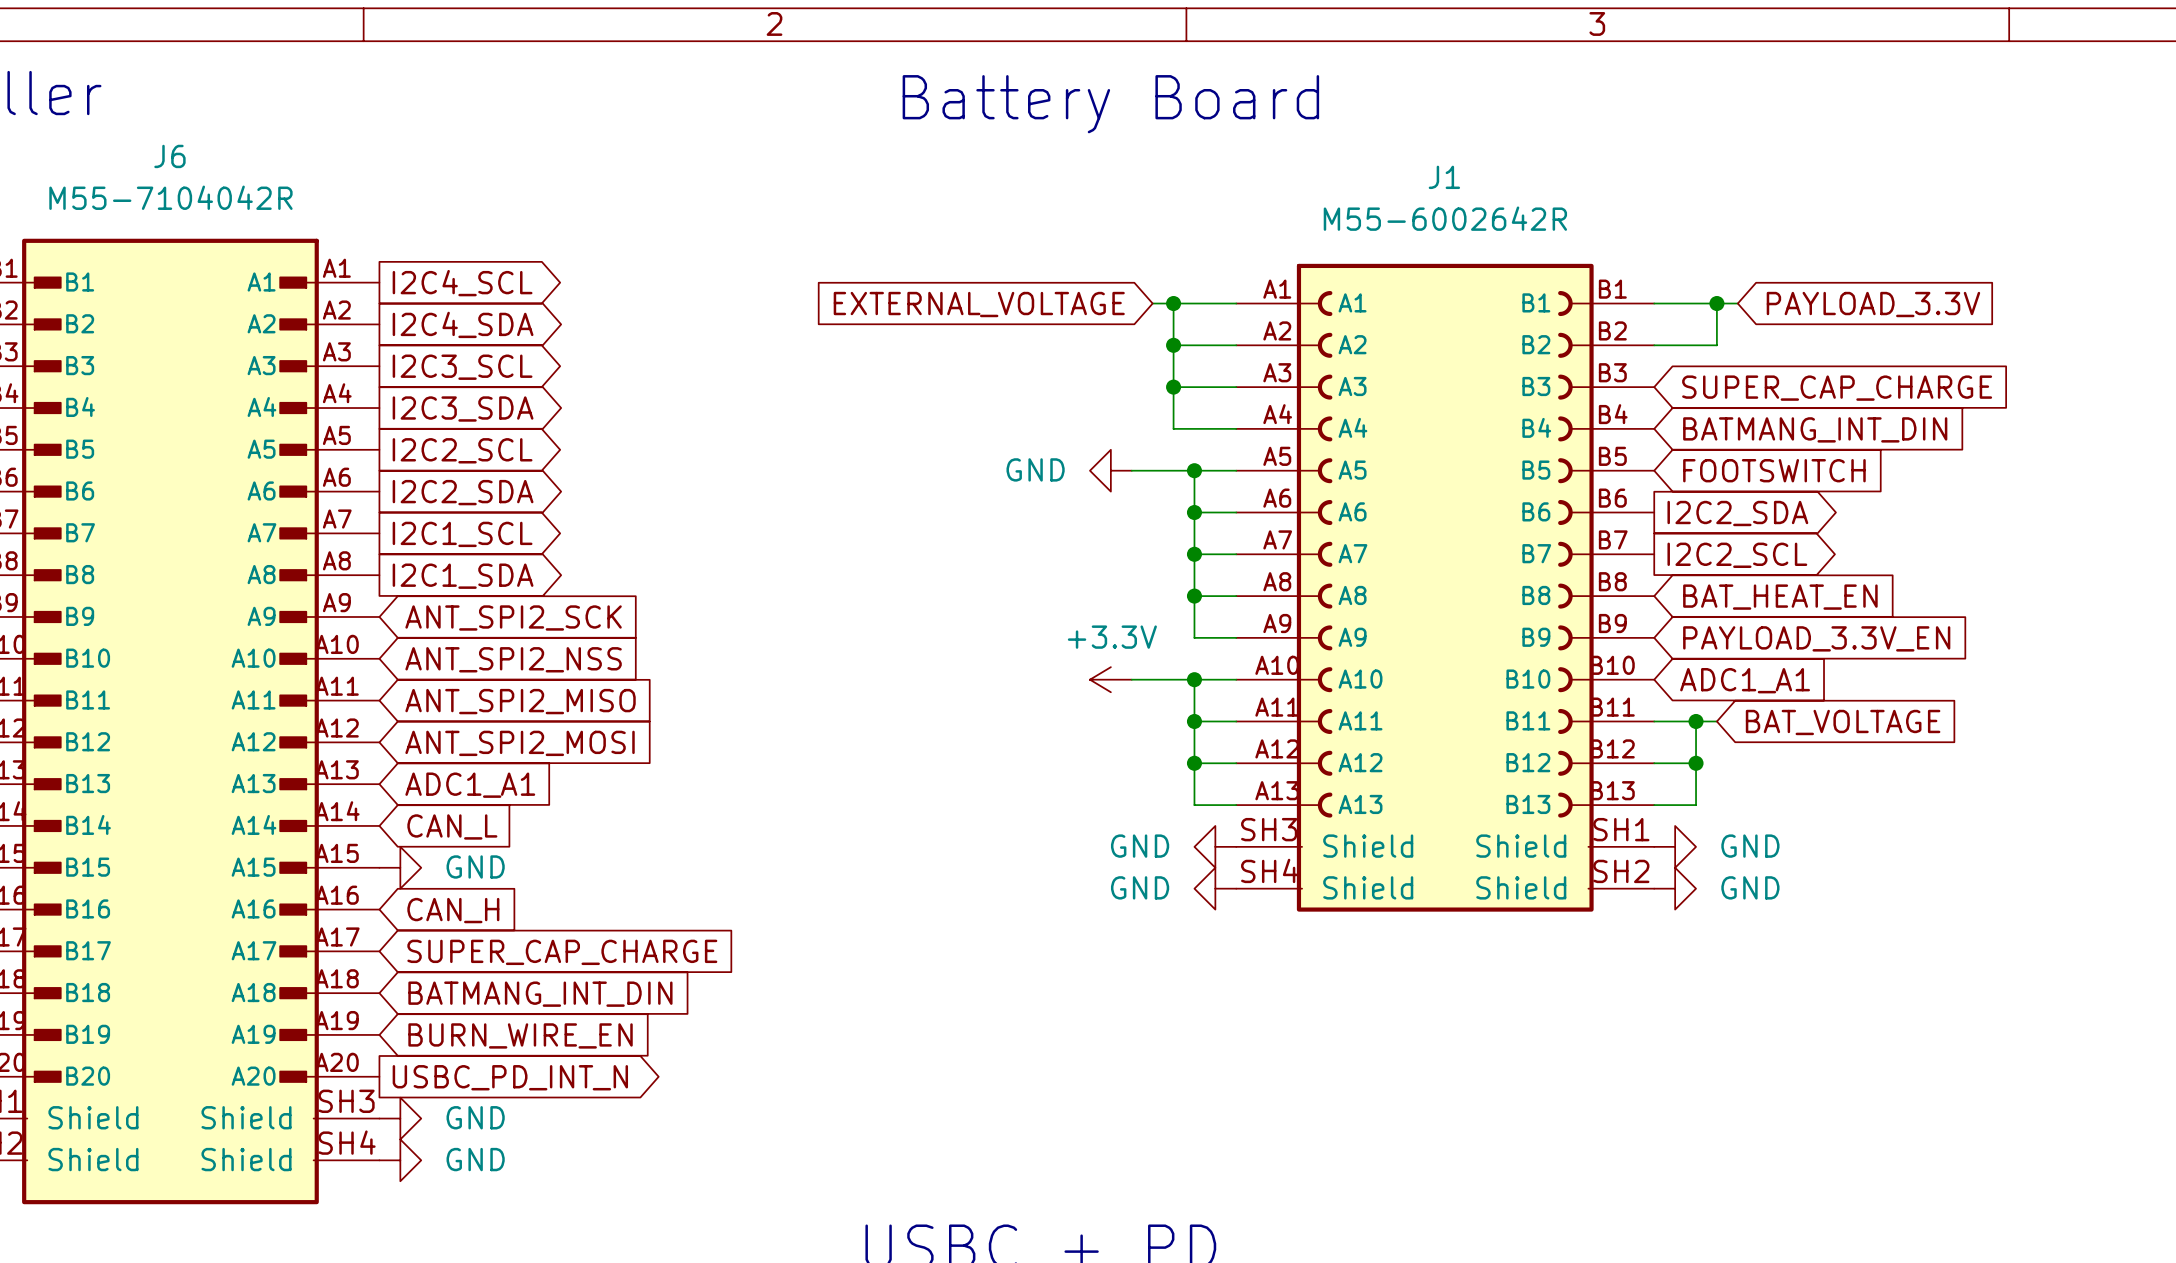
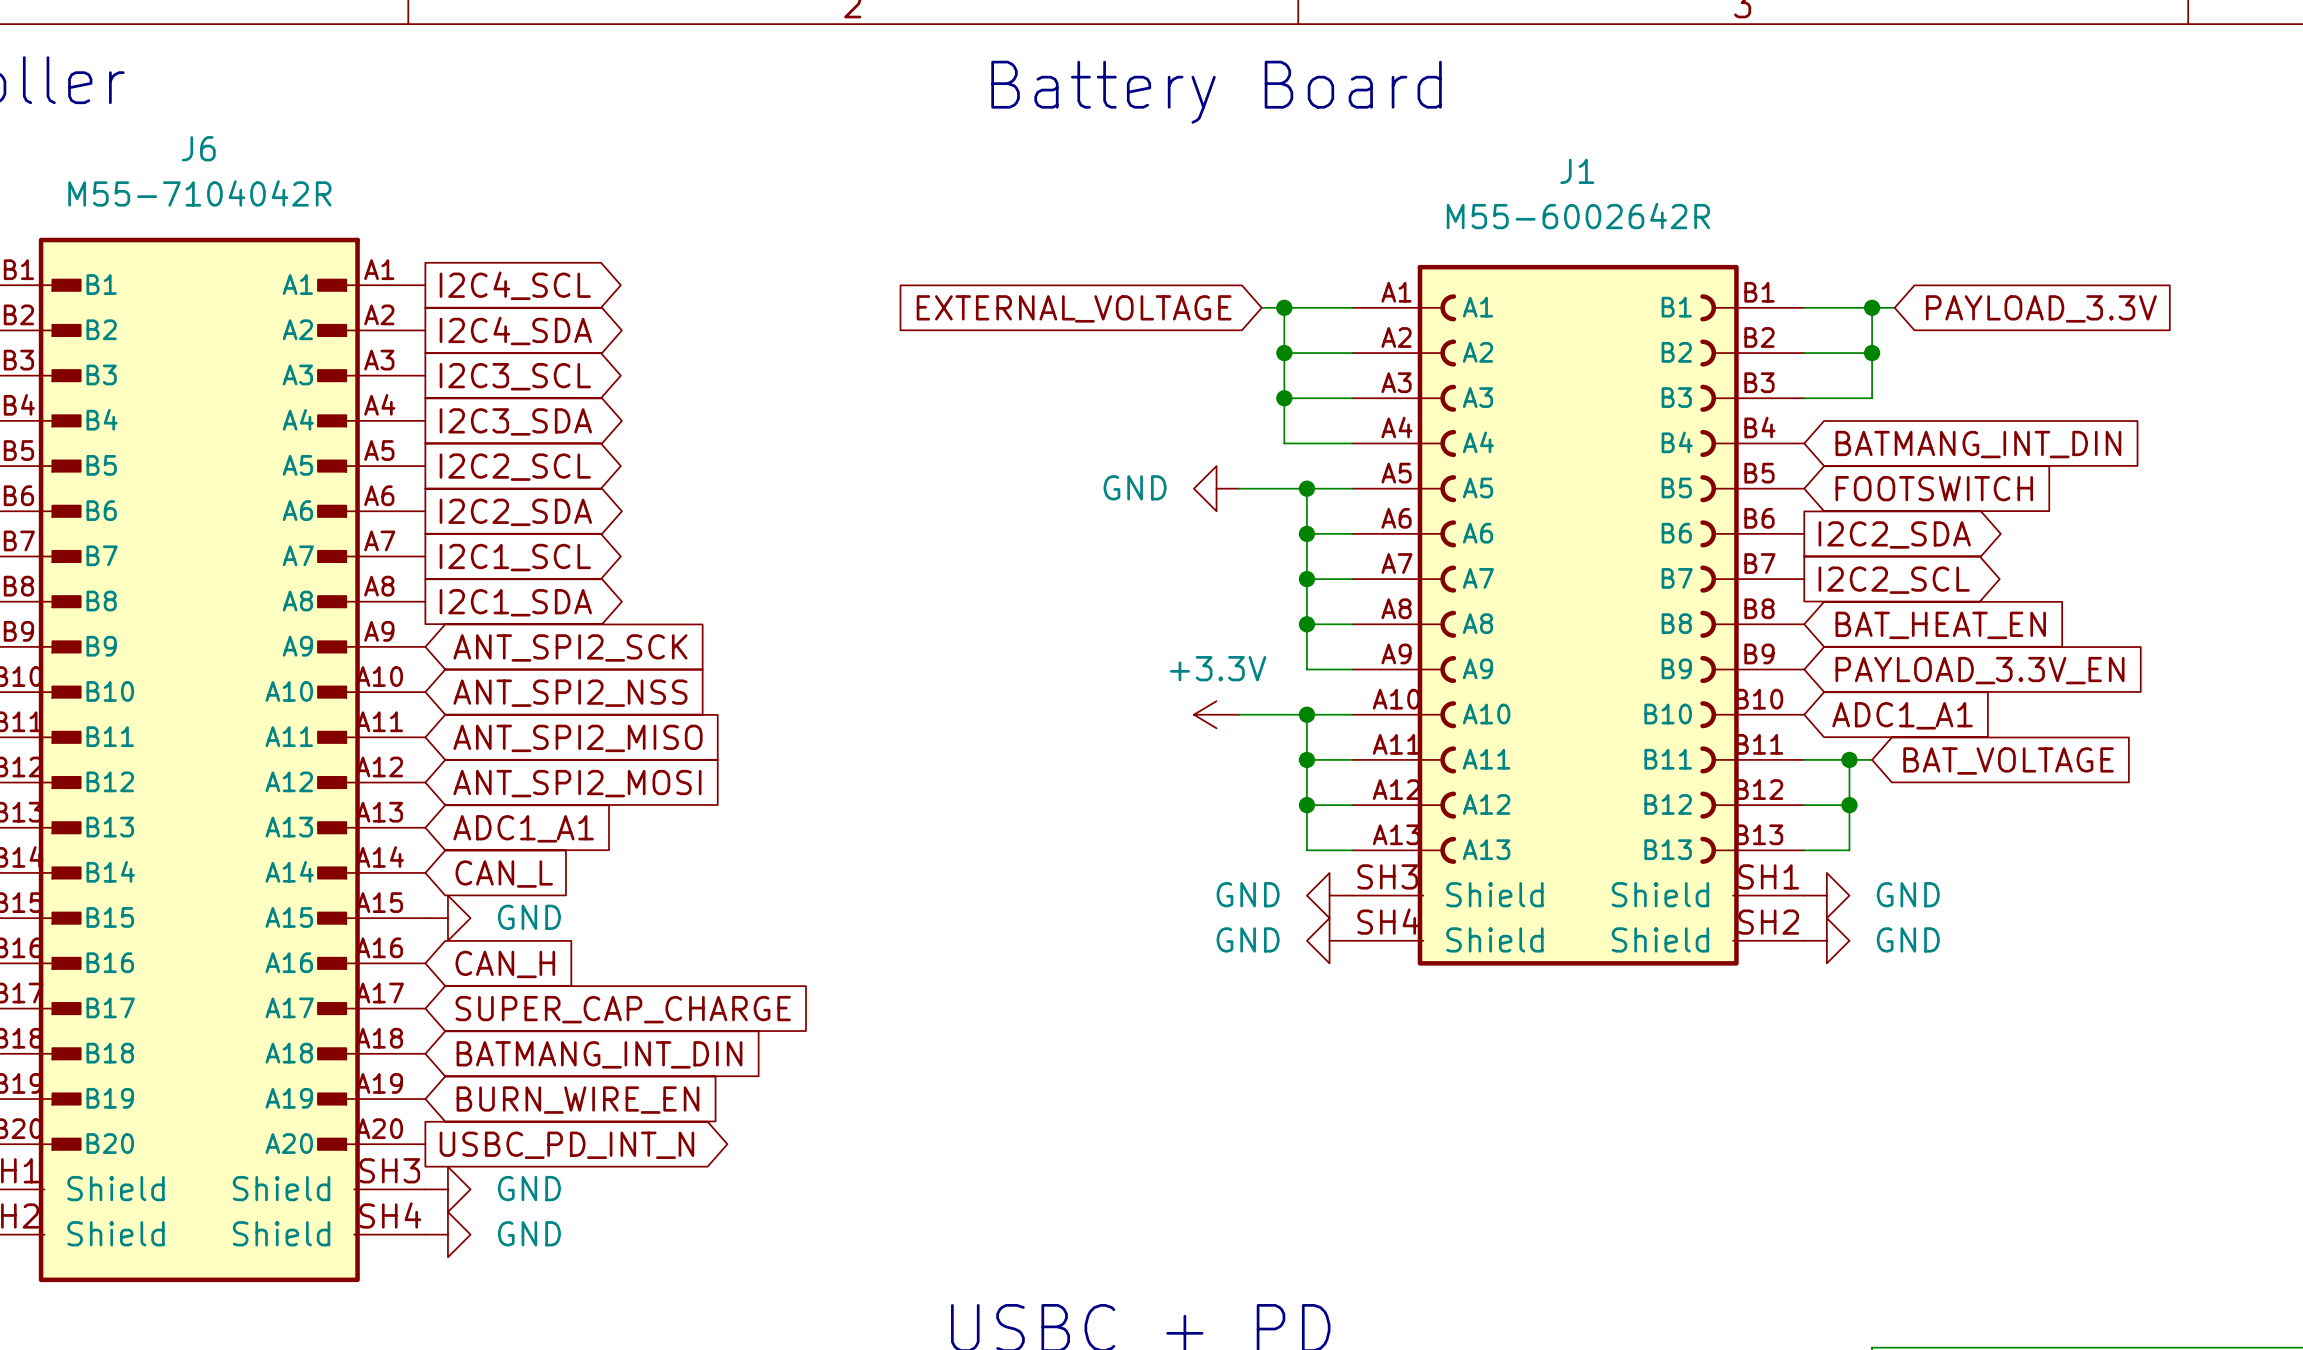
wire: none -> (1872, 353) (1872, 398) (1804, 398)
junction: none -> (1872, 353)
global label: SUPER_CAP_CHARGE (1837, 388) -> none

